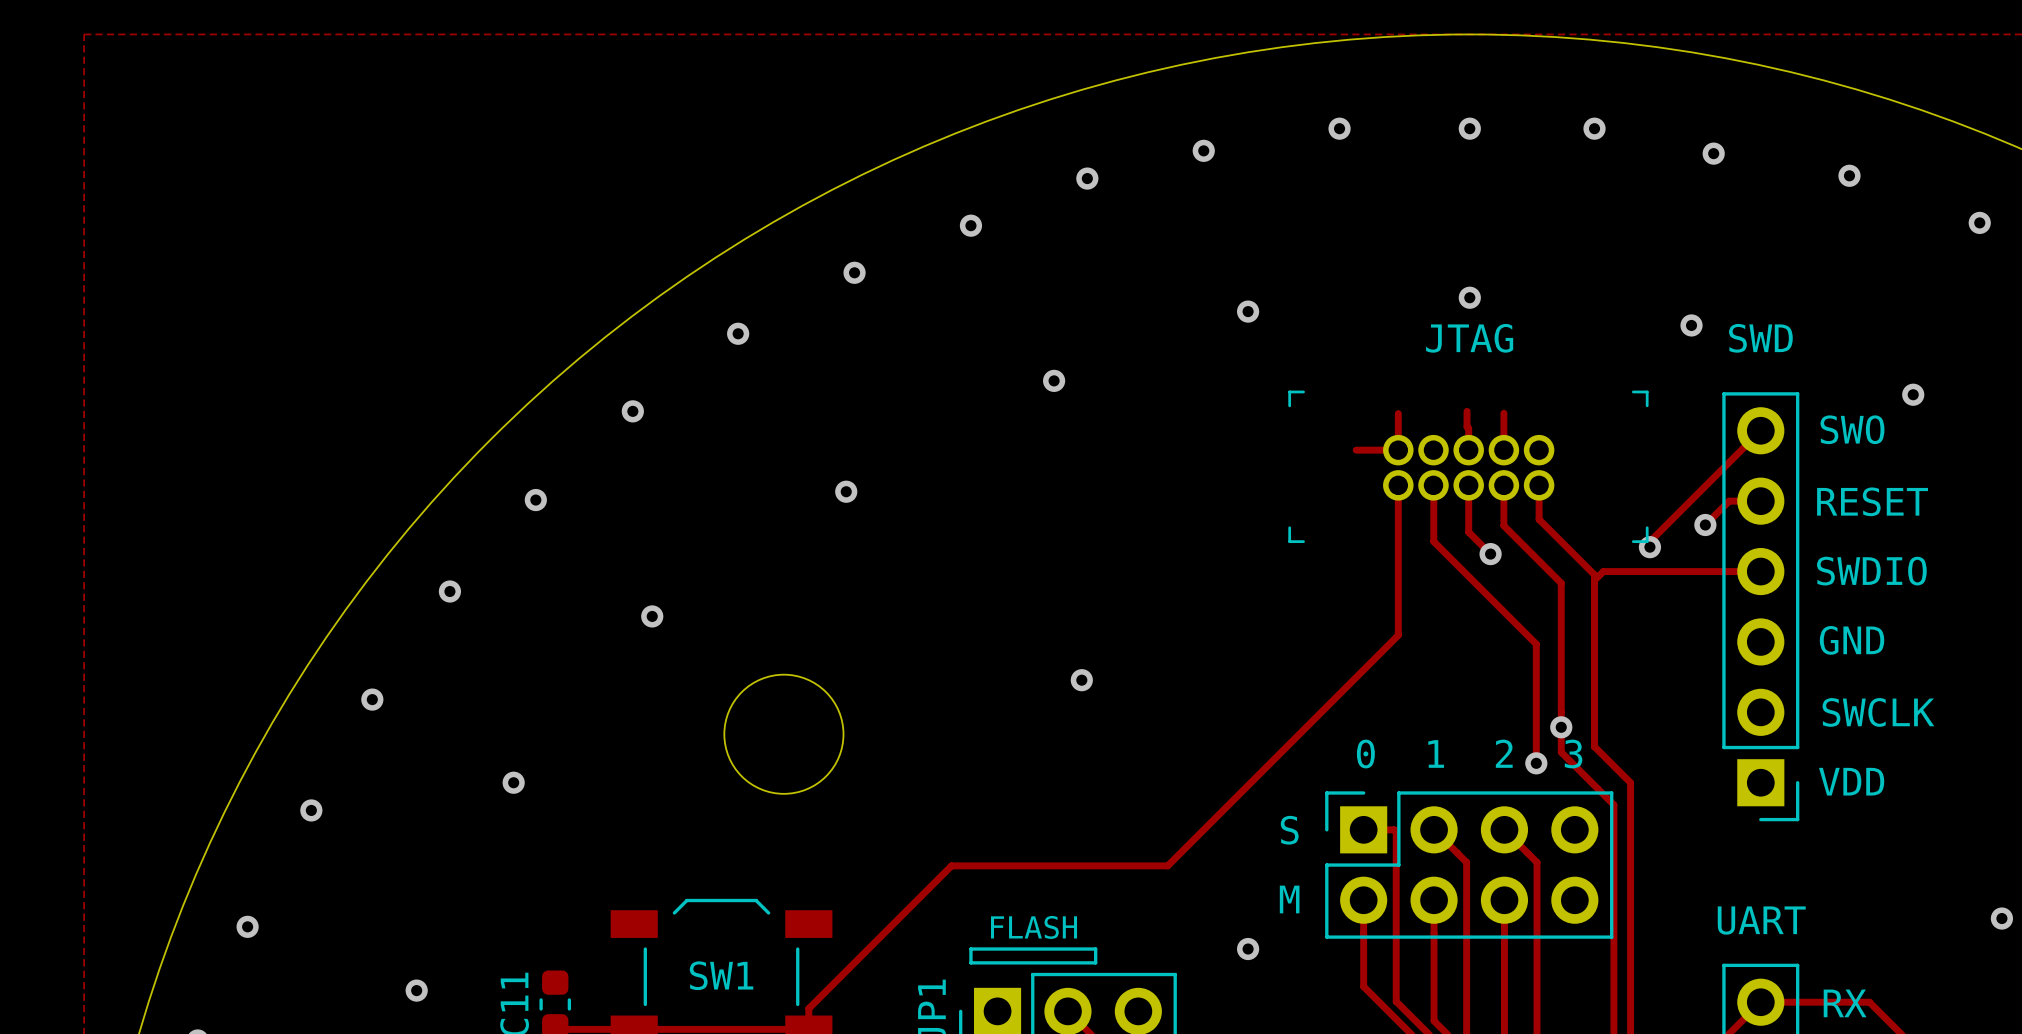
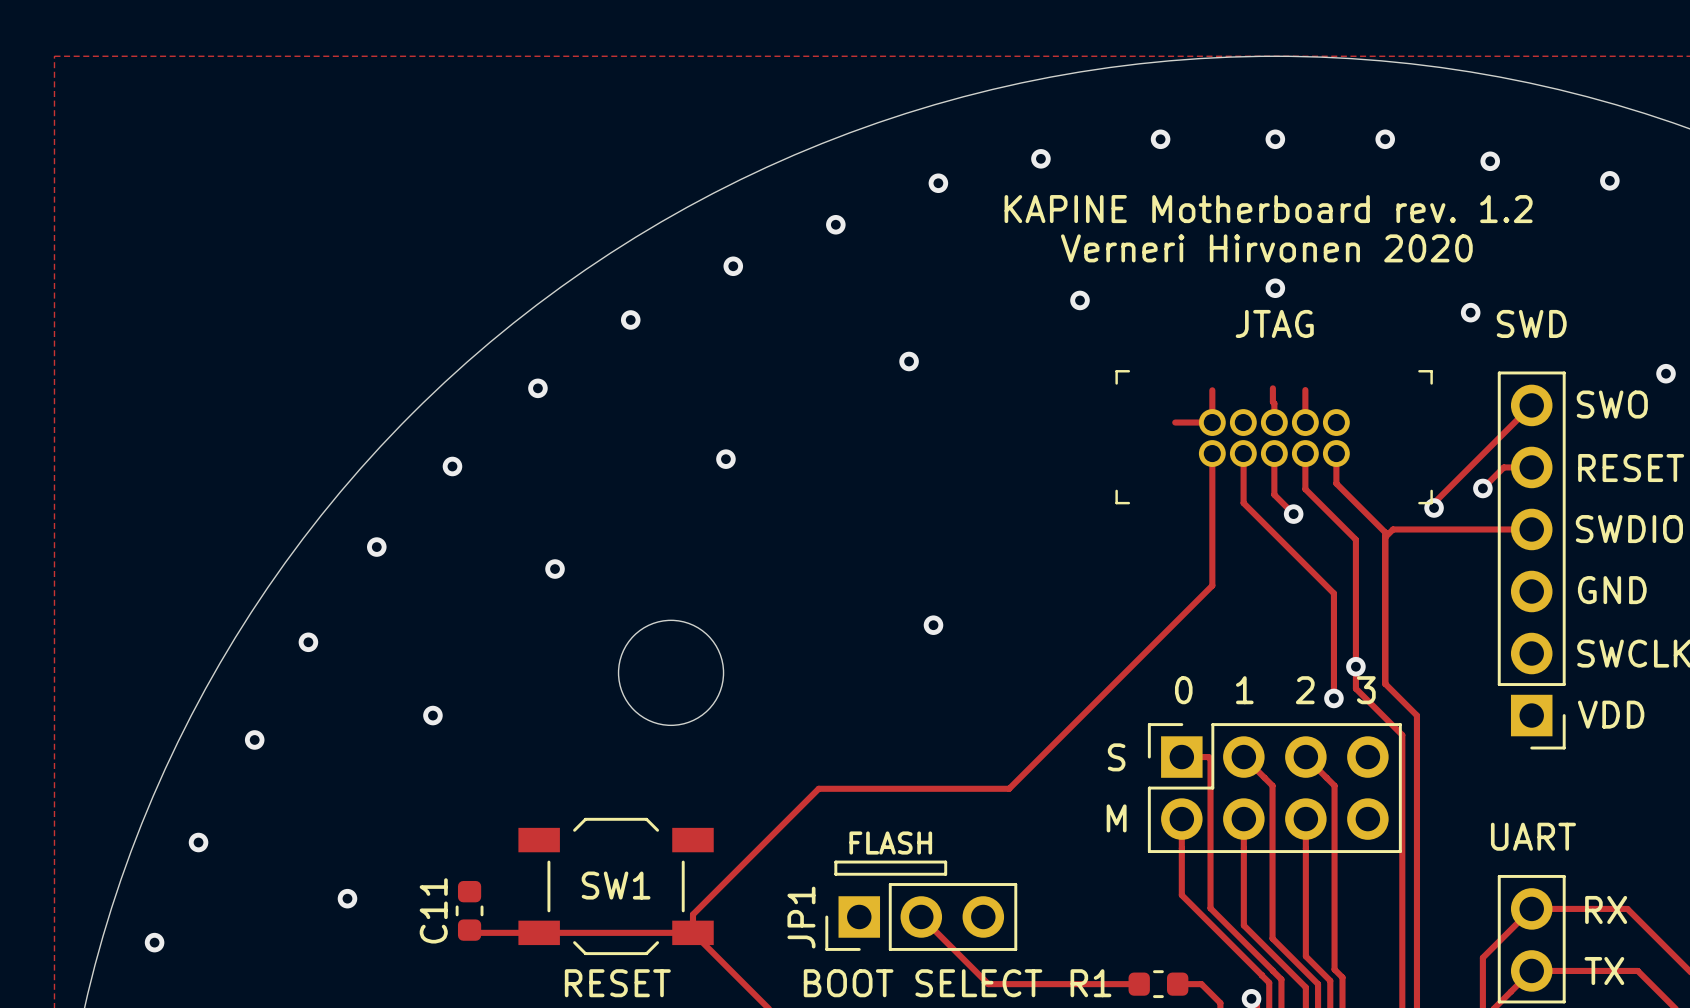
text: none -> KAPINE Motherboard rev. 1.2 (1268, 209)
text: none -> Verneri Hirvonen 2020 (1266, 248)
via: (1248, 949) -> none

